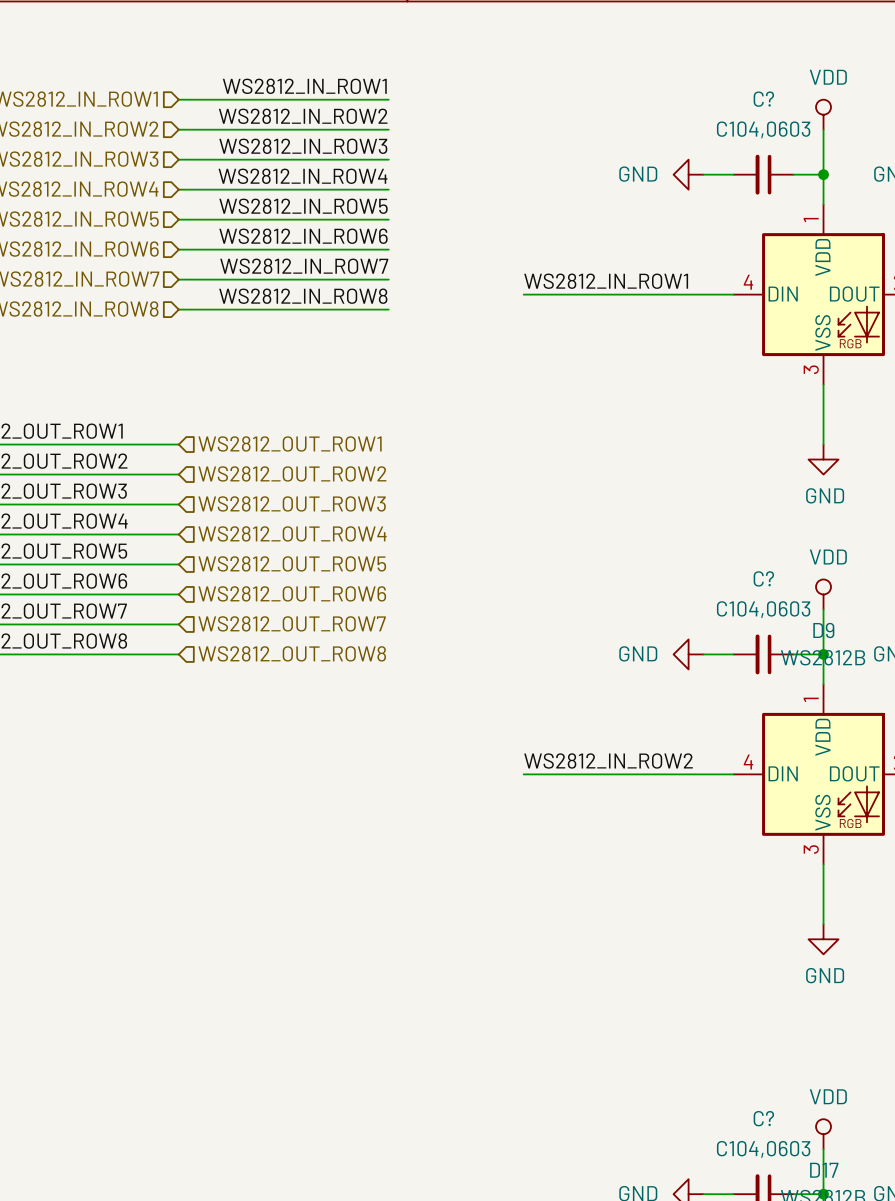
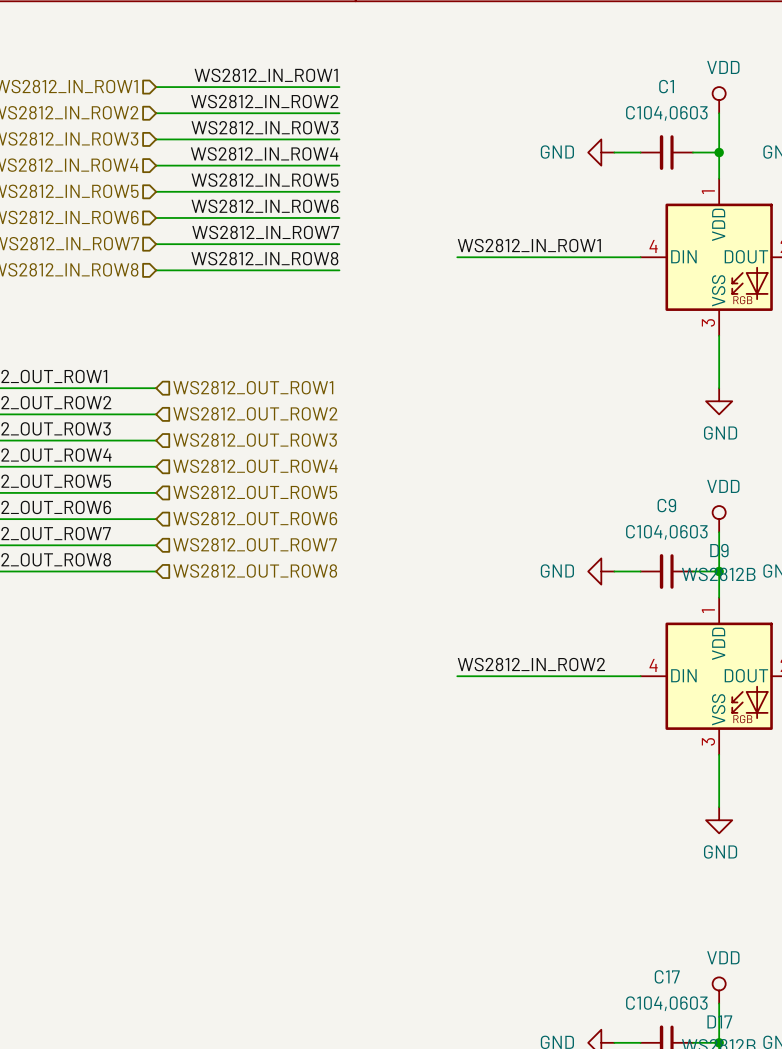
C? name: C? (763, 99) -> C1 (666, 86)
C? name: C? (763, 578) -> C9 (666, 505)
C? name: C? (763, 1118) -> C17 (667, 976)

